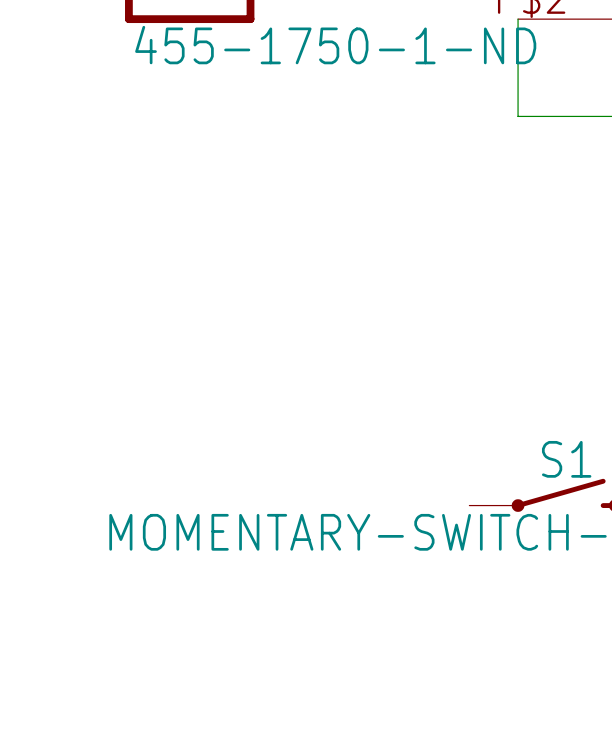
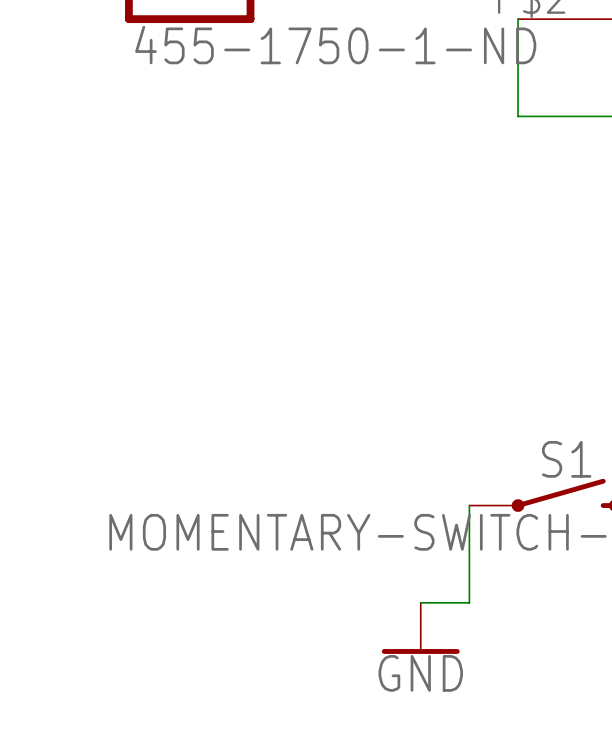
wire: none -> (469, 505) (469, 602) (420, 602)
power symbol: none -> GND (420, 628)

